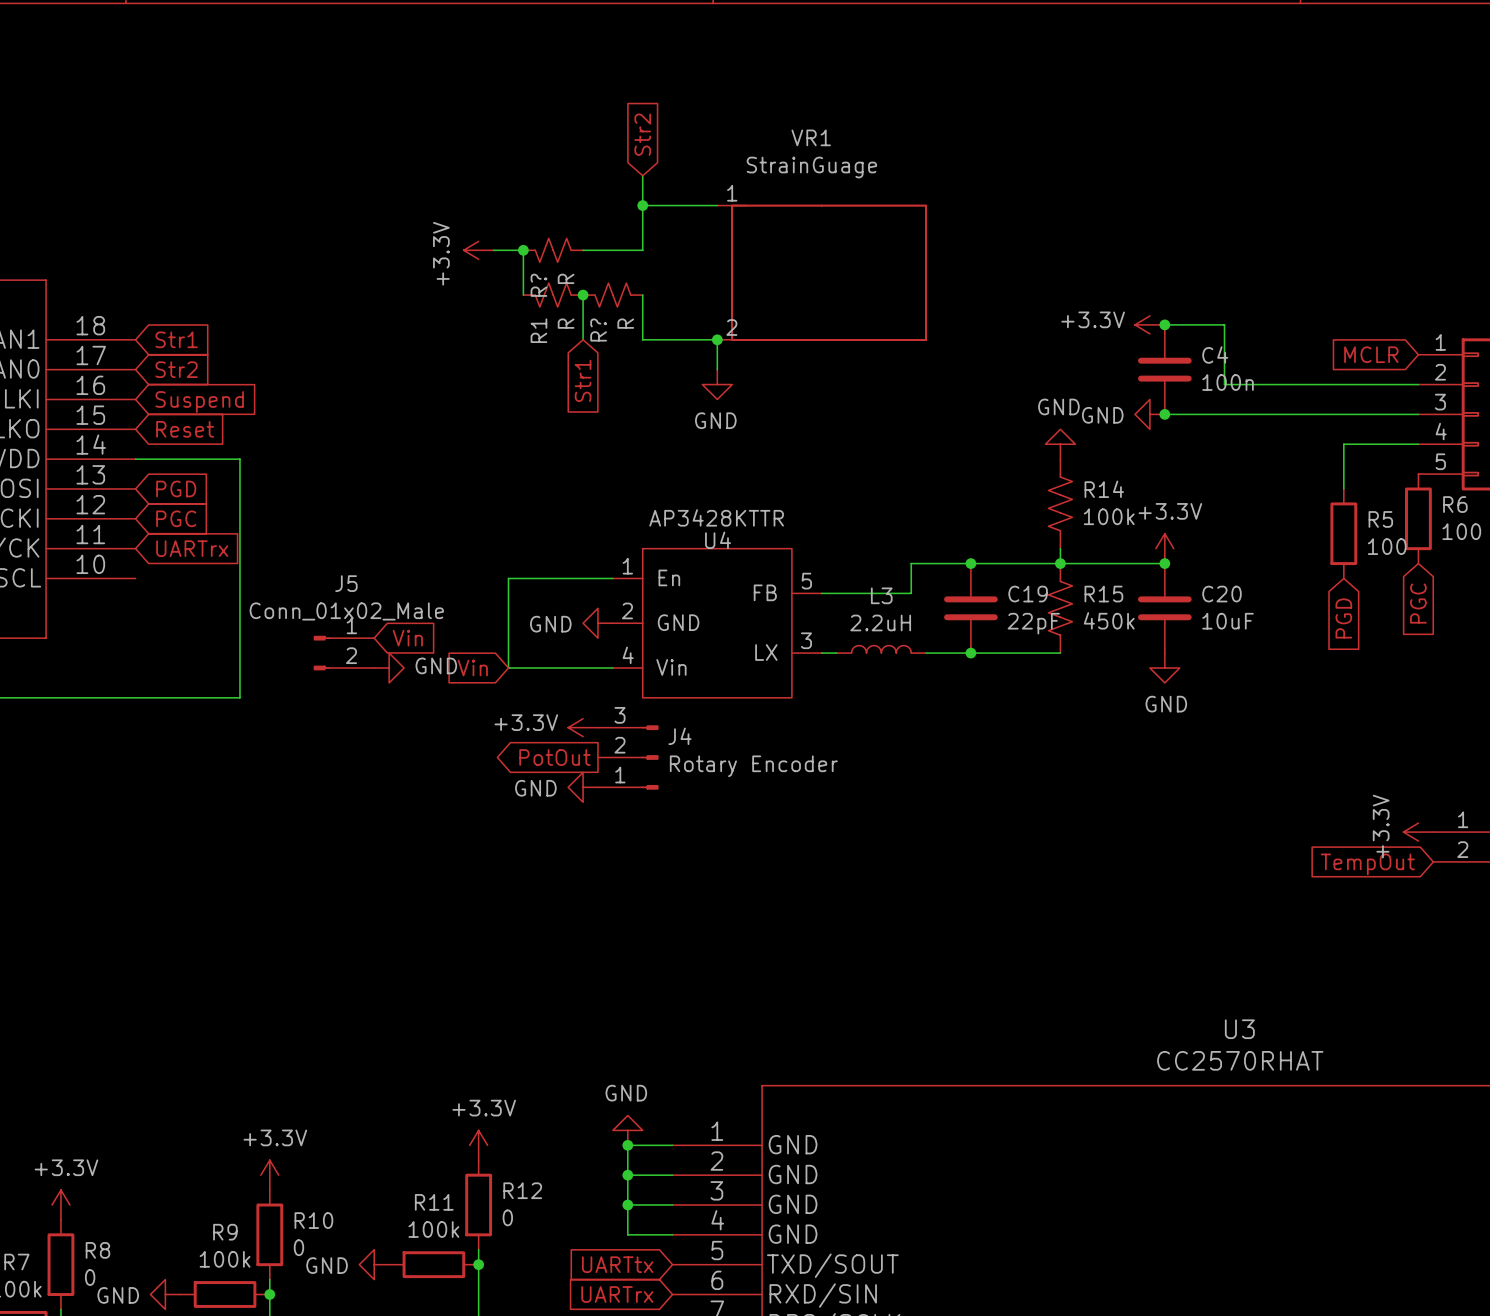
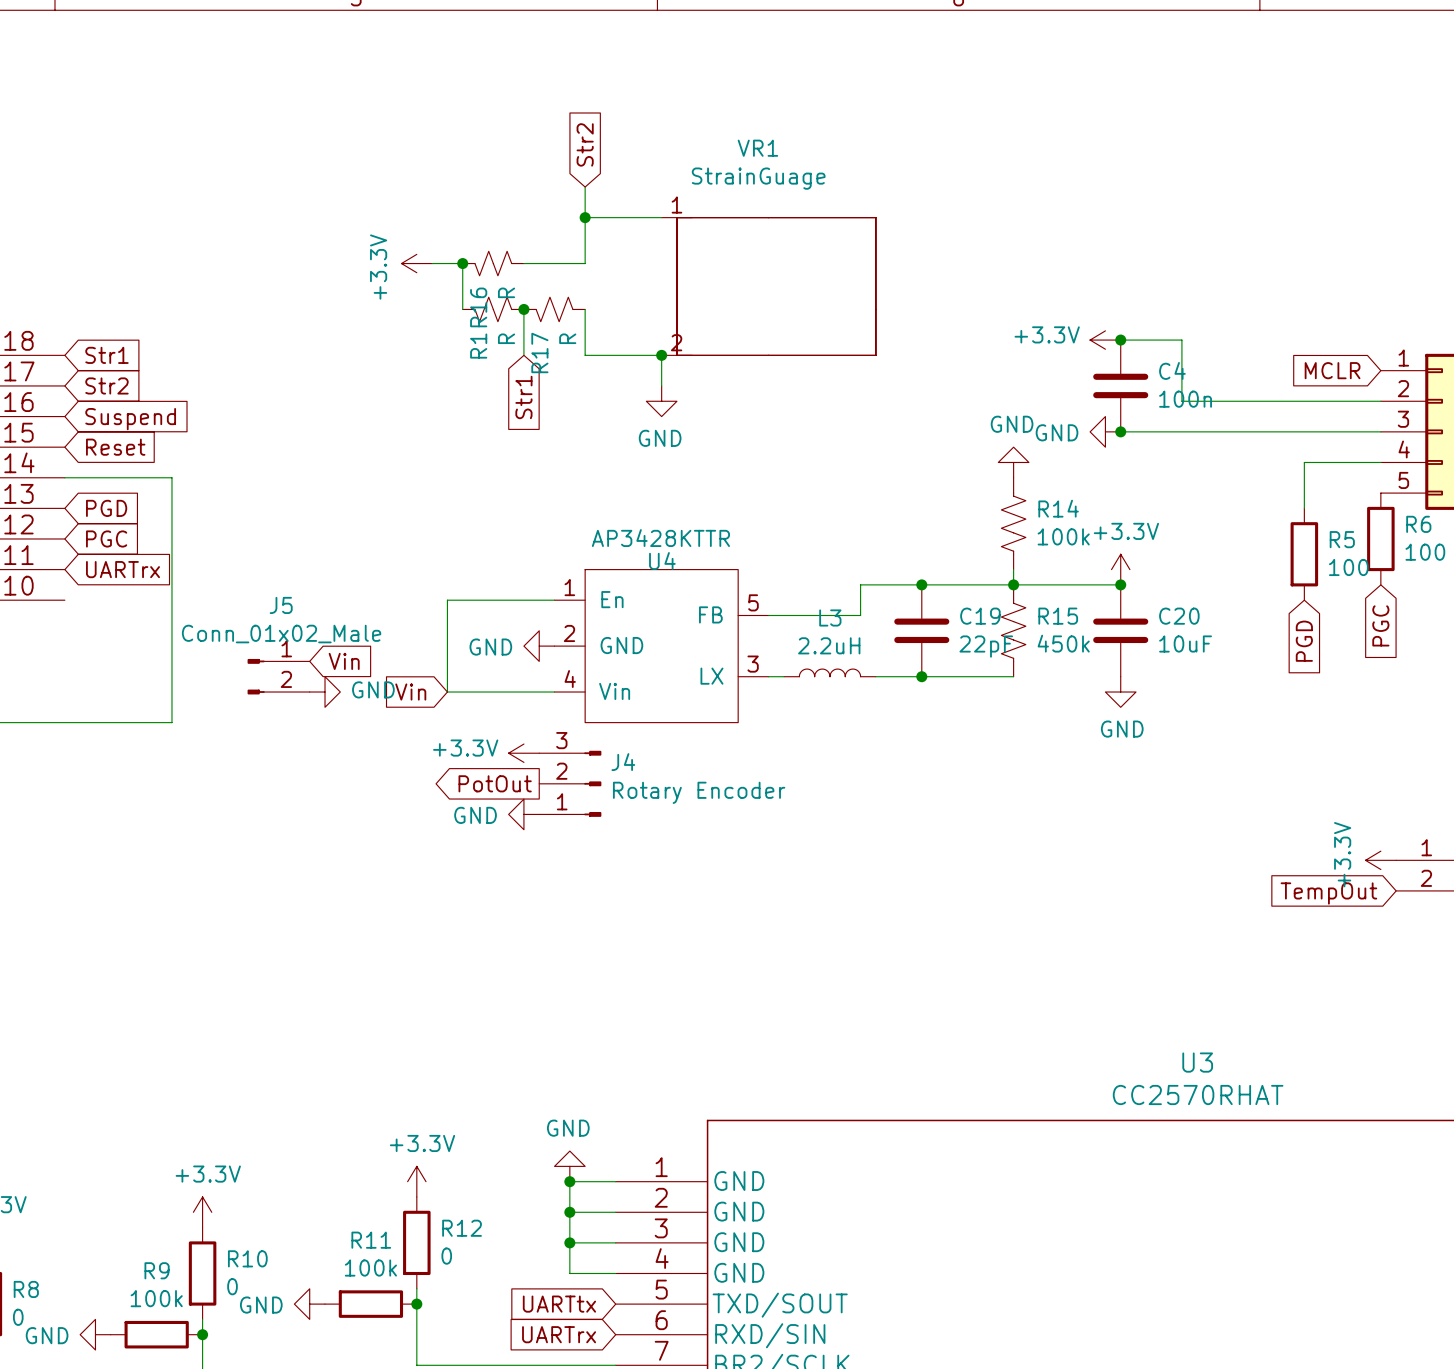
R? name: R? (538, 285) -> R16 (478, 307)
R? name: R? (598, 330) -> R17 (539, 352)

